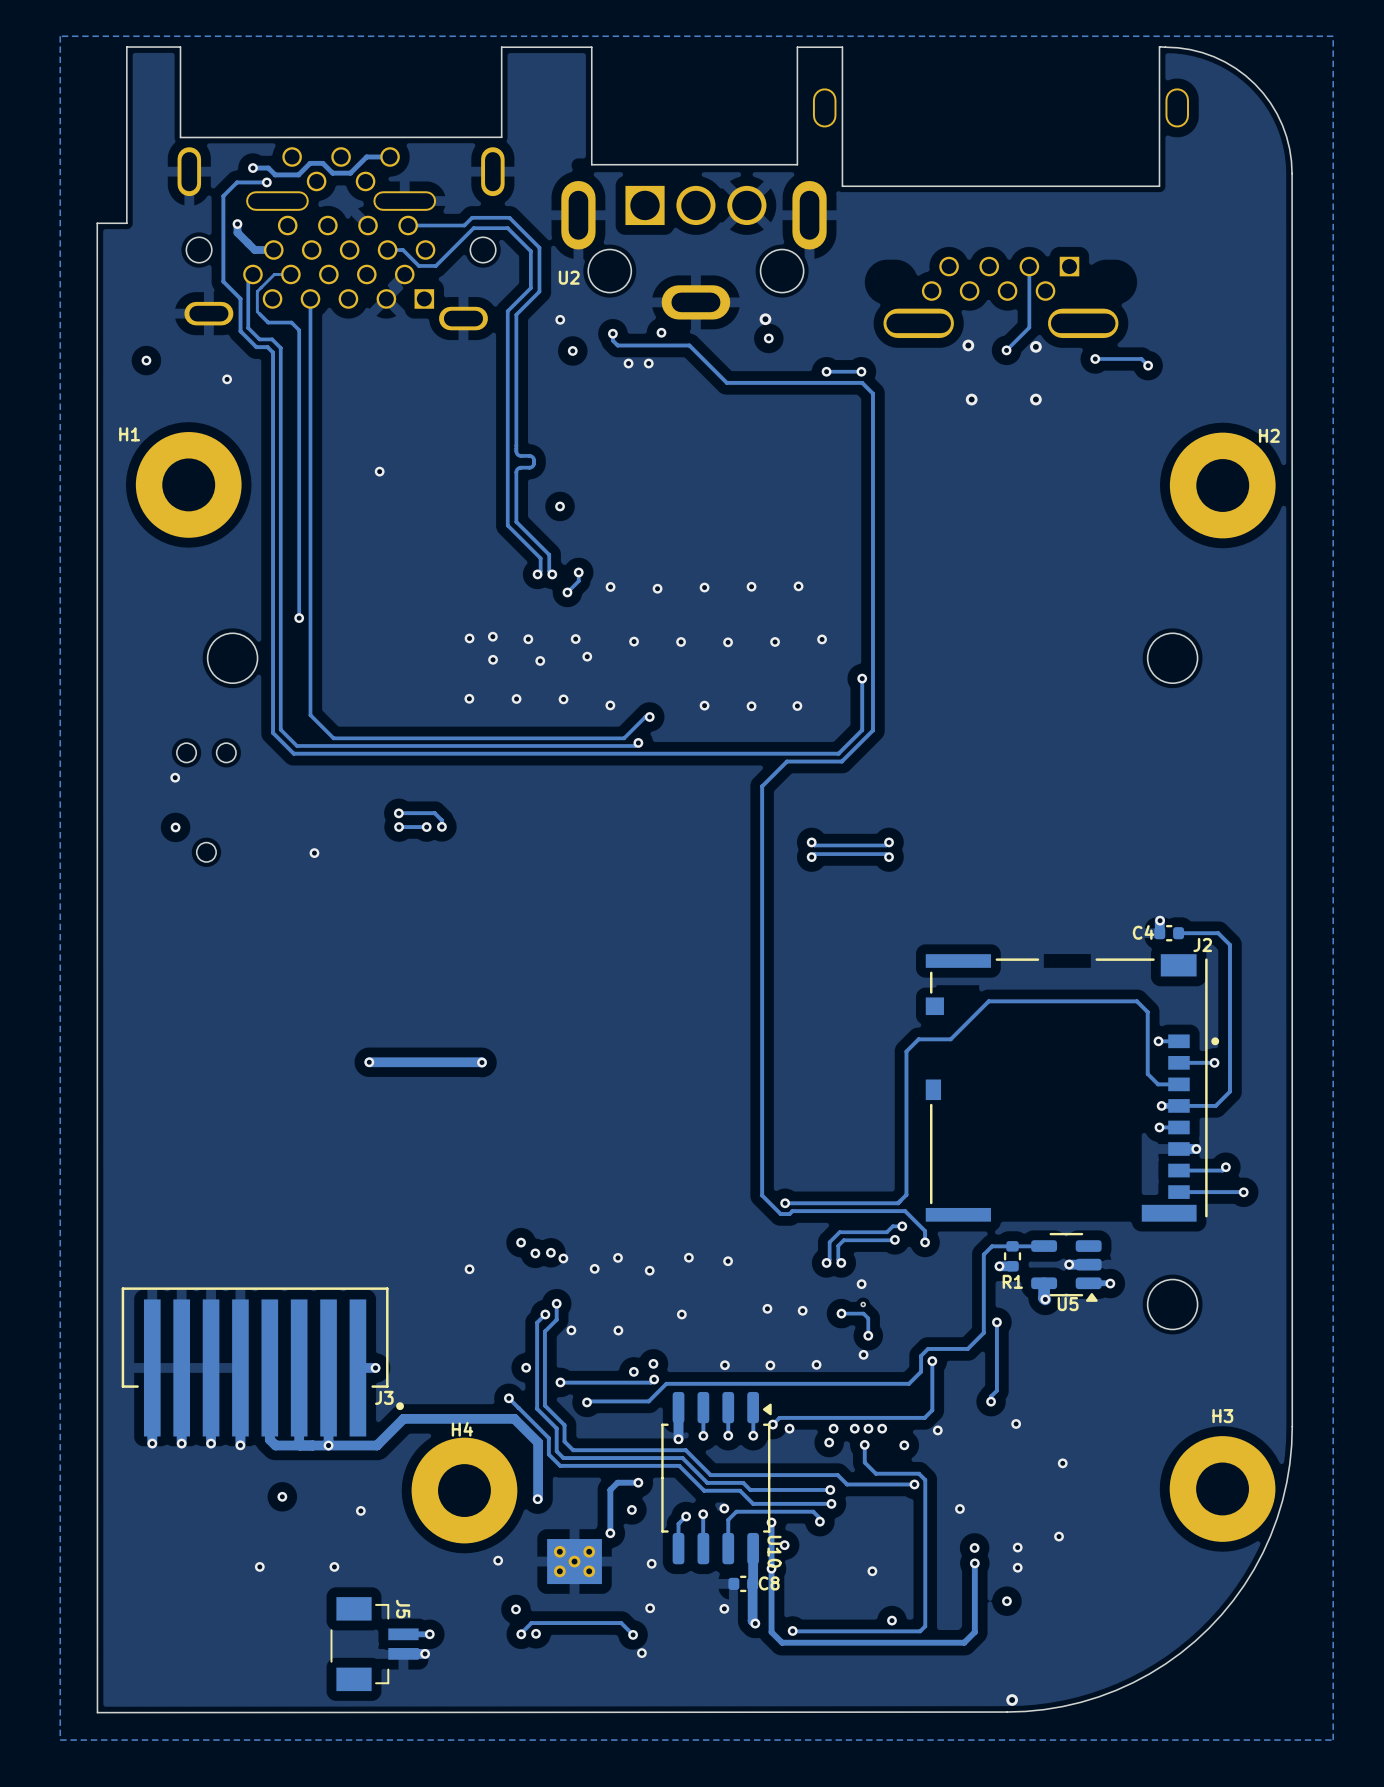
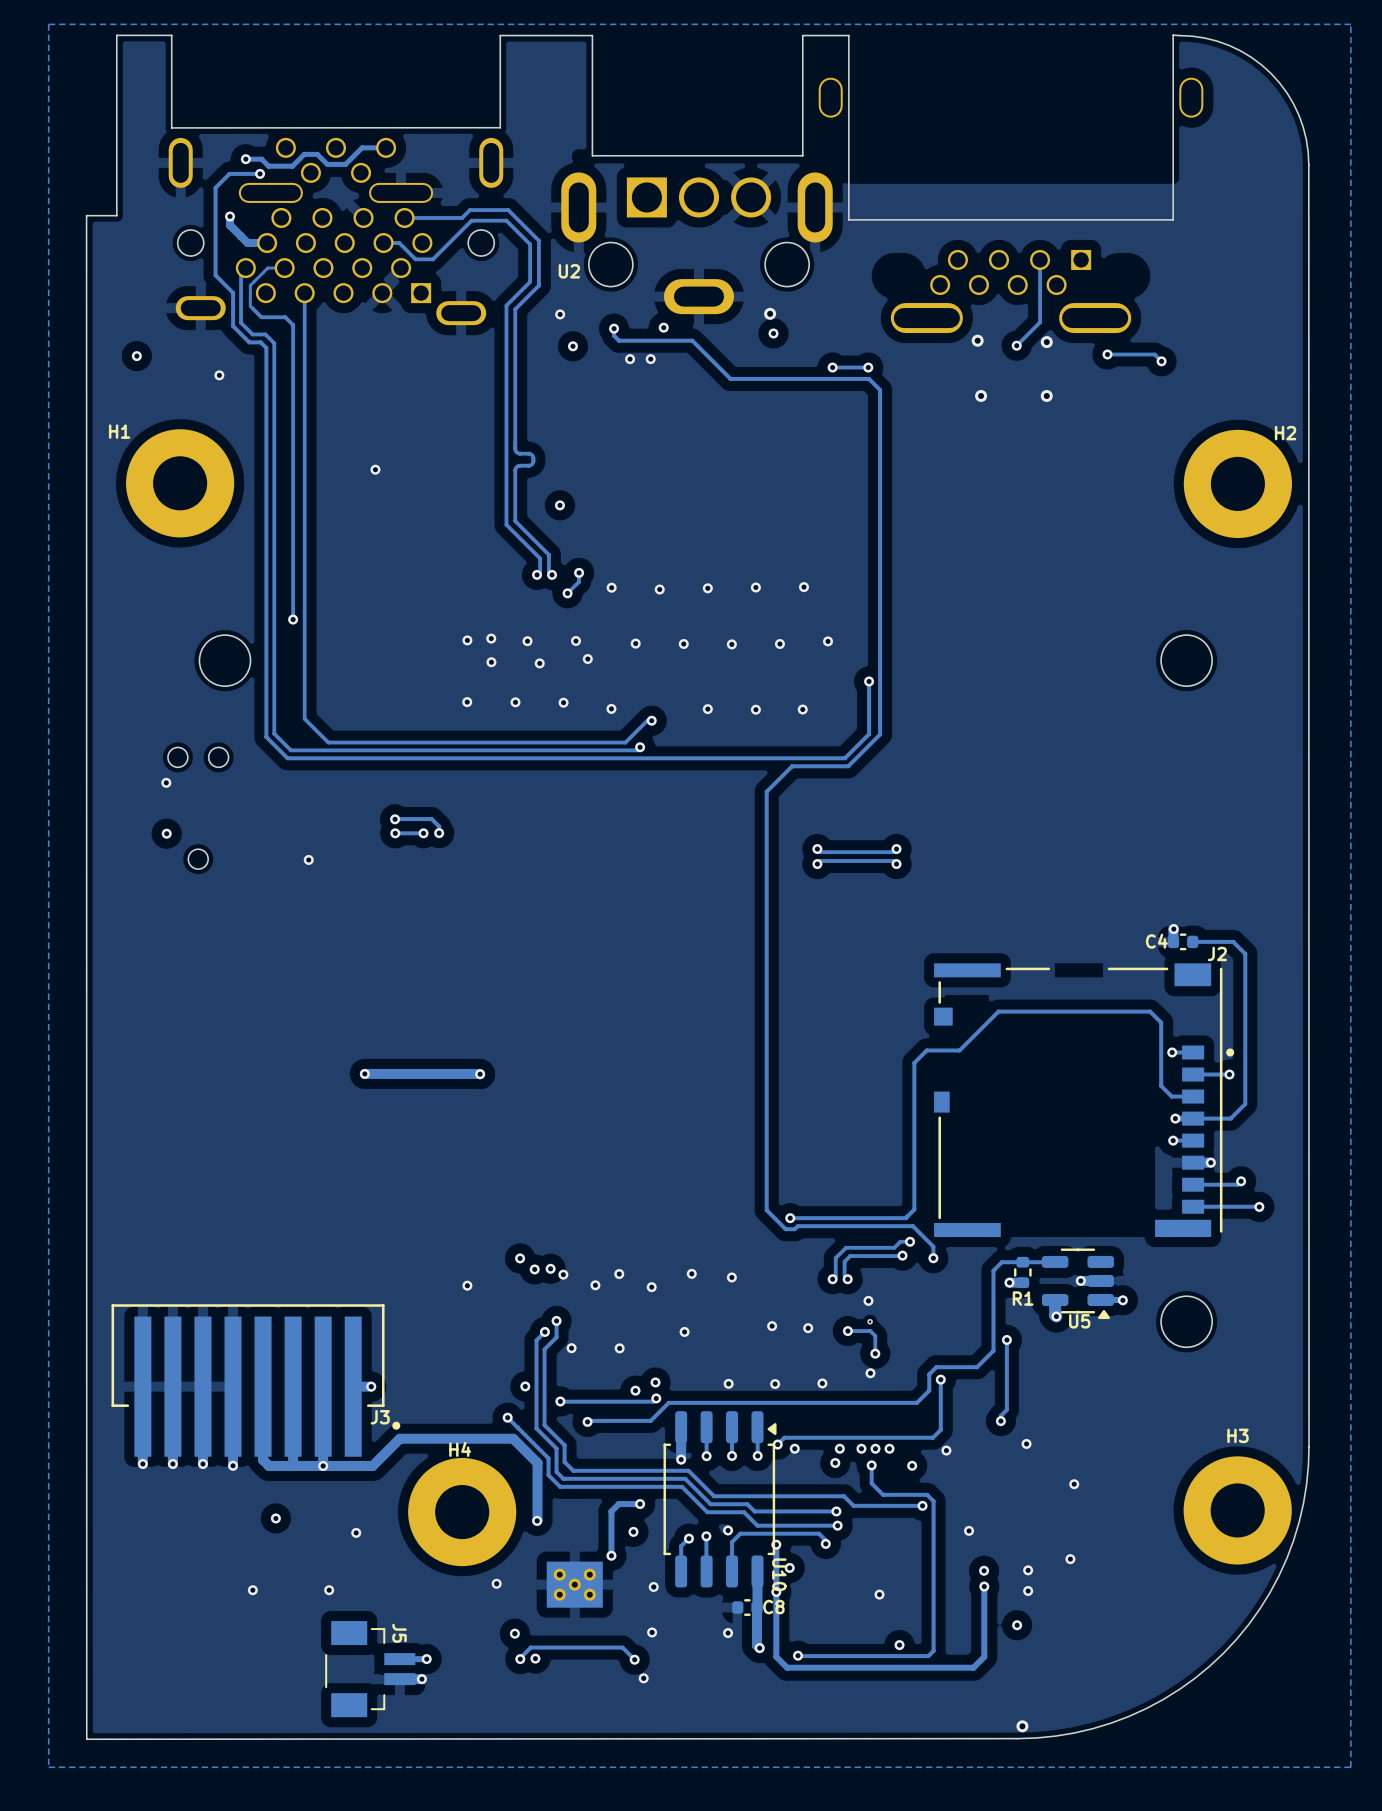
board edge: (1159, 186) (842, 186) -> (1173, 177) (1173, 219) (848, 219) (848, 177)

